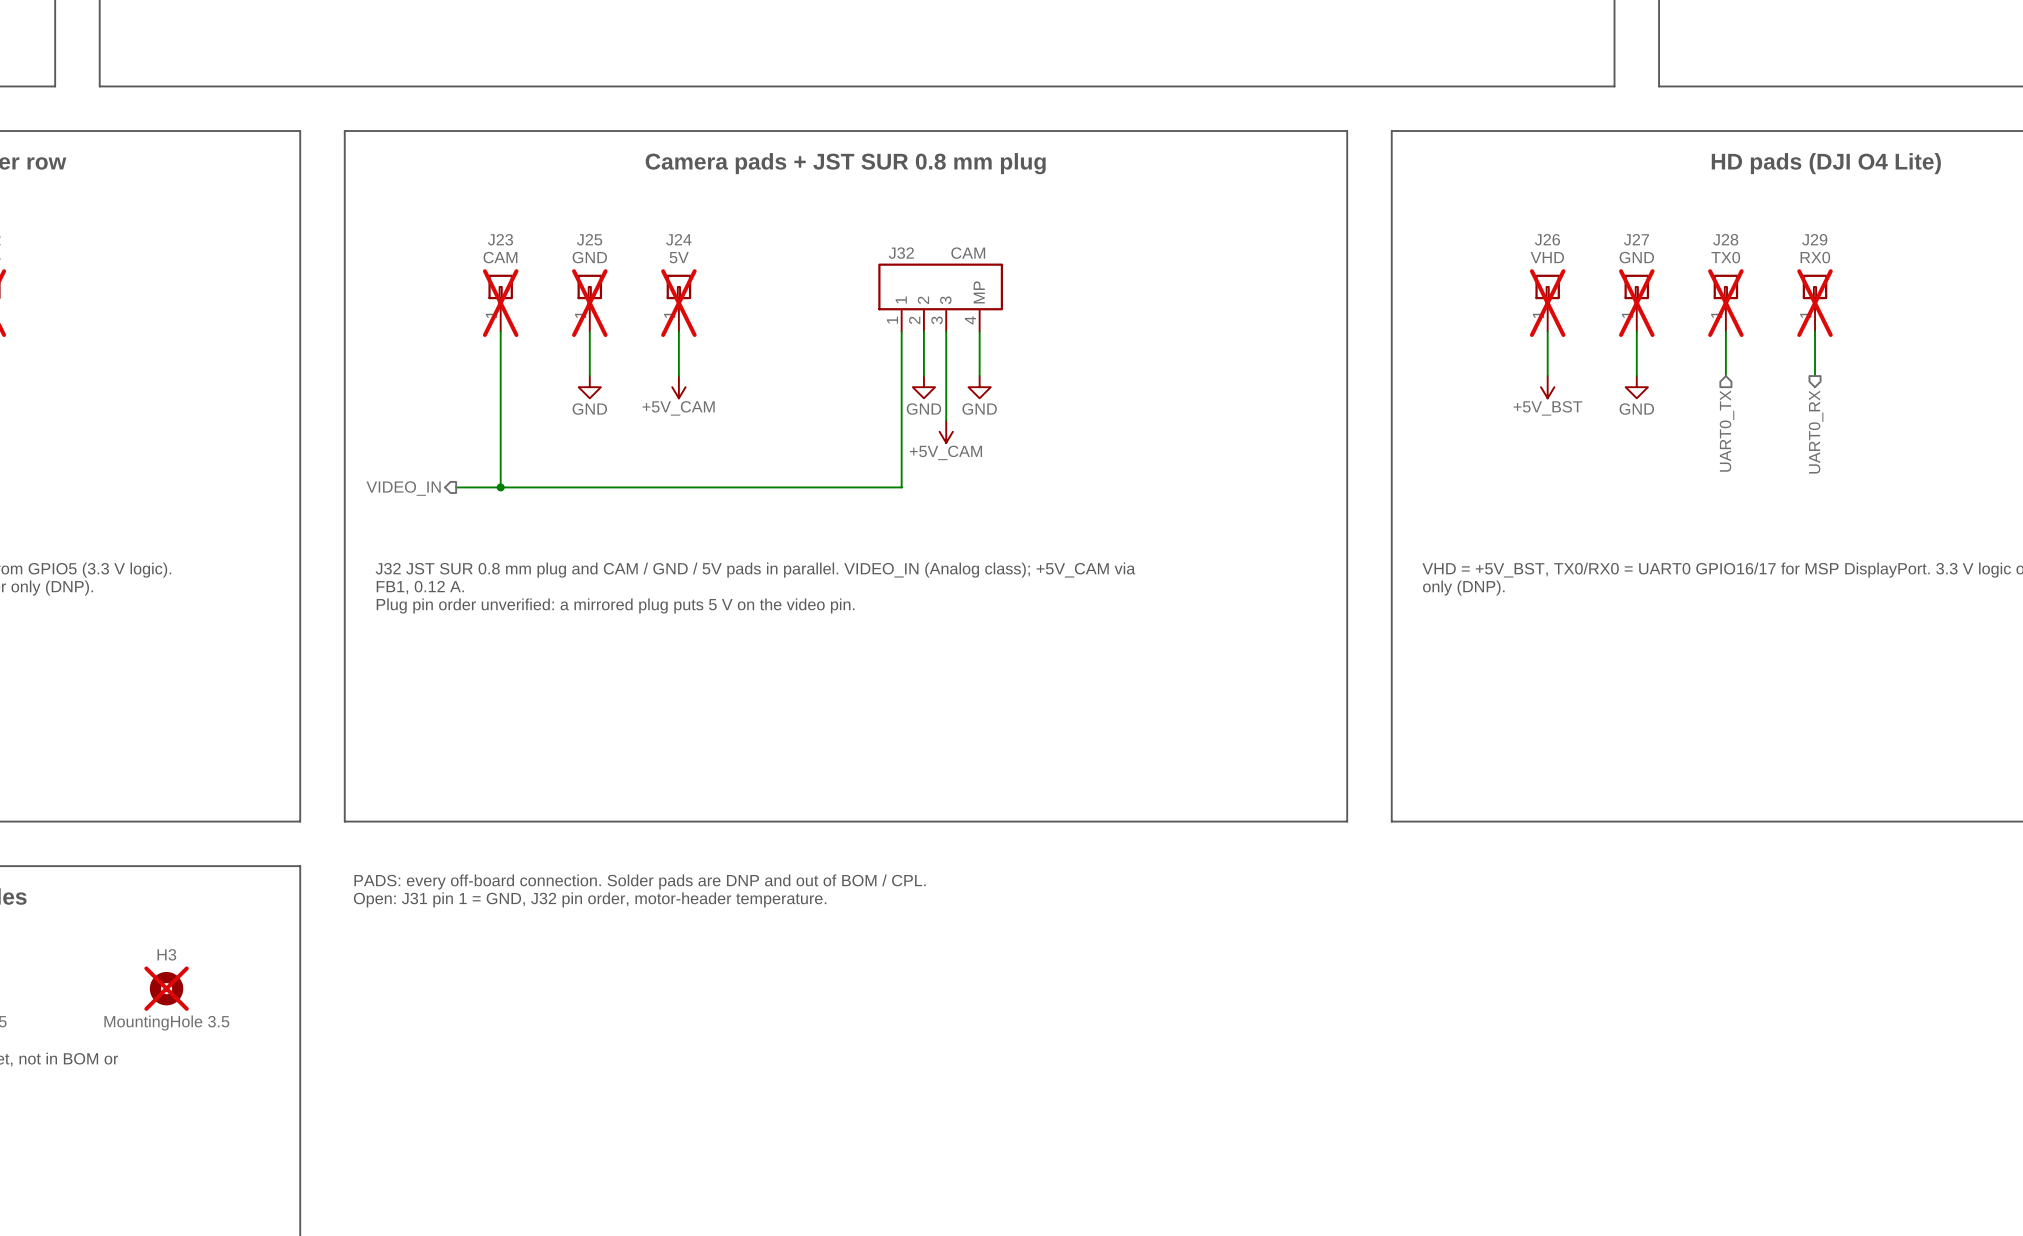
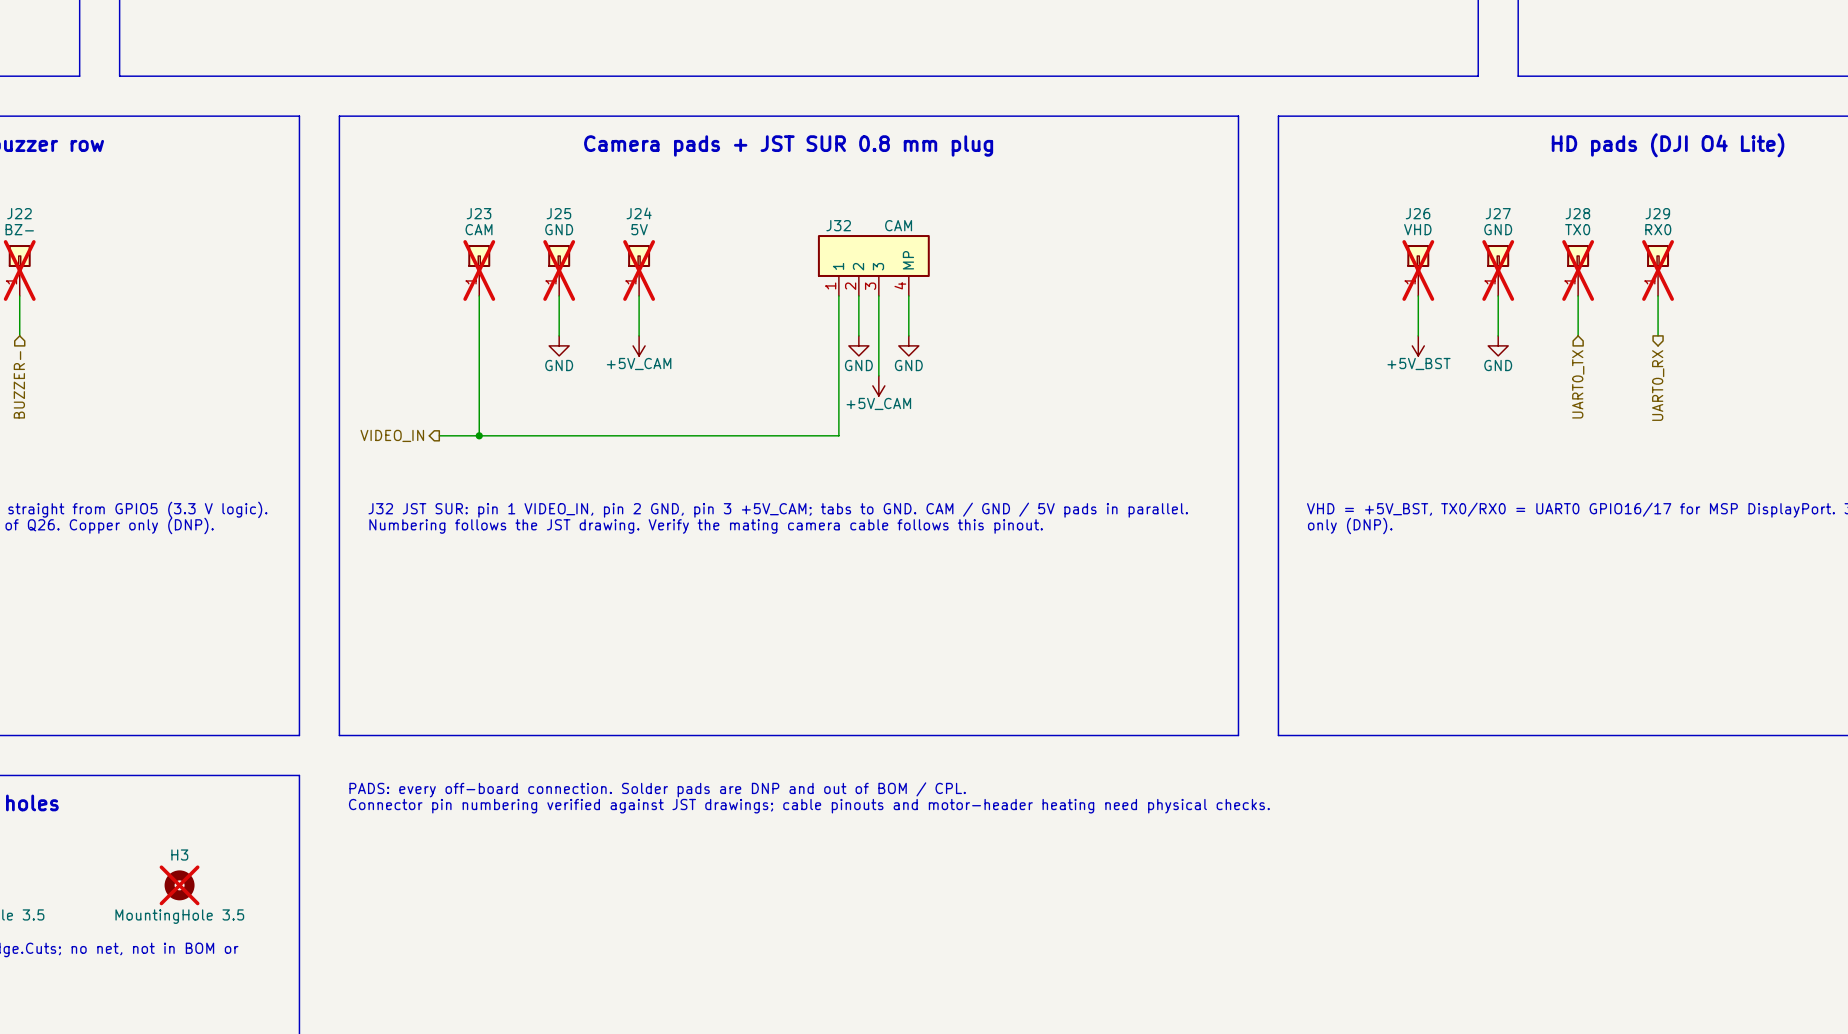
text: J32 JST SUR 0.8 mm plug and CAM / GND / 5V pads in parallel. VIDEO_IN (Analog class); +5V_CAM via (755, 570) -> J32 JST SUR: pin 1 VIDEO_IN, pin 2 GND, pin 3 +5V_CAM; tabs to GND. CAM / GND / 5V pads in parallel. (778, 510)
text: FB1, 0.12 A. (420, 587) -> Numbering follows the JST drawing. Verify the mating camera cable follows this pinout. (706, 526)
text: Plug pin order unverified: a mirrored plug puts 5 V on the video pin. (615, 605) -> none
text: Open: J31 pin 1 = GND, J32 pin order, motor-header temperature. (590, 899) -> Connector pin numbering verified against JST drawings; cable pinouts and motor-header heating need physical checks. (809, 806)

